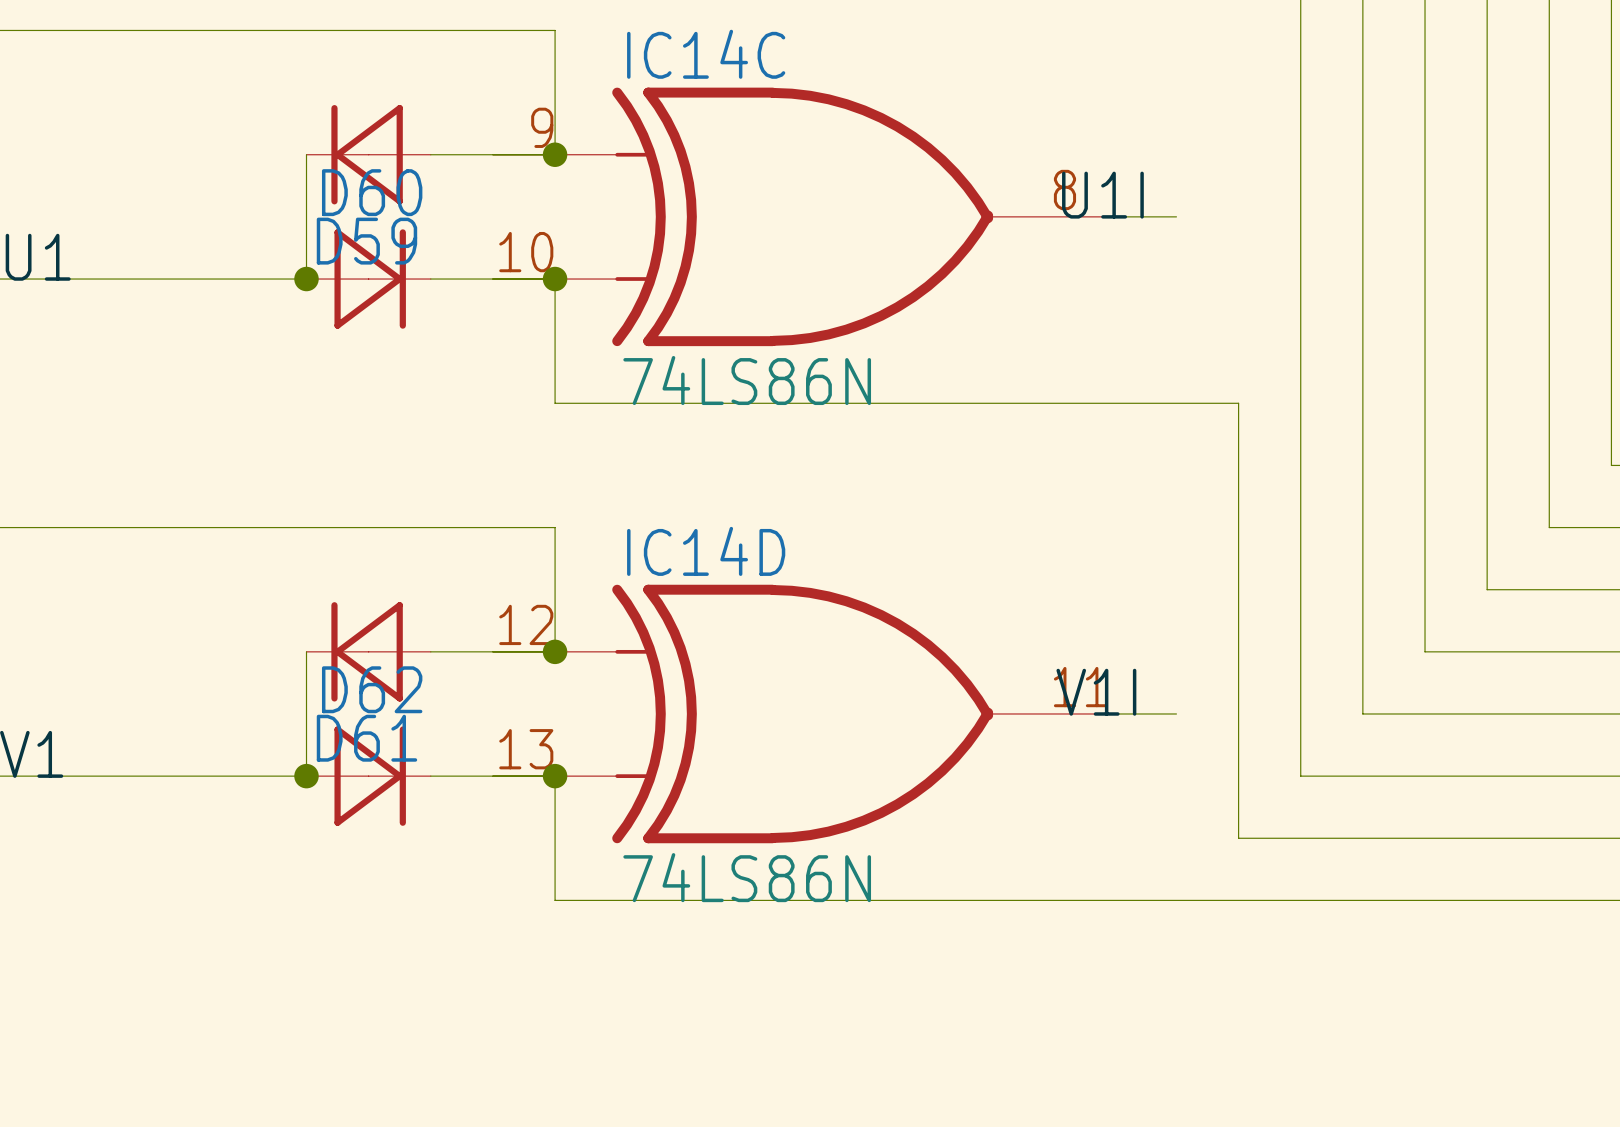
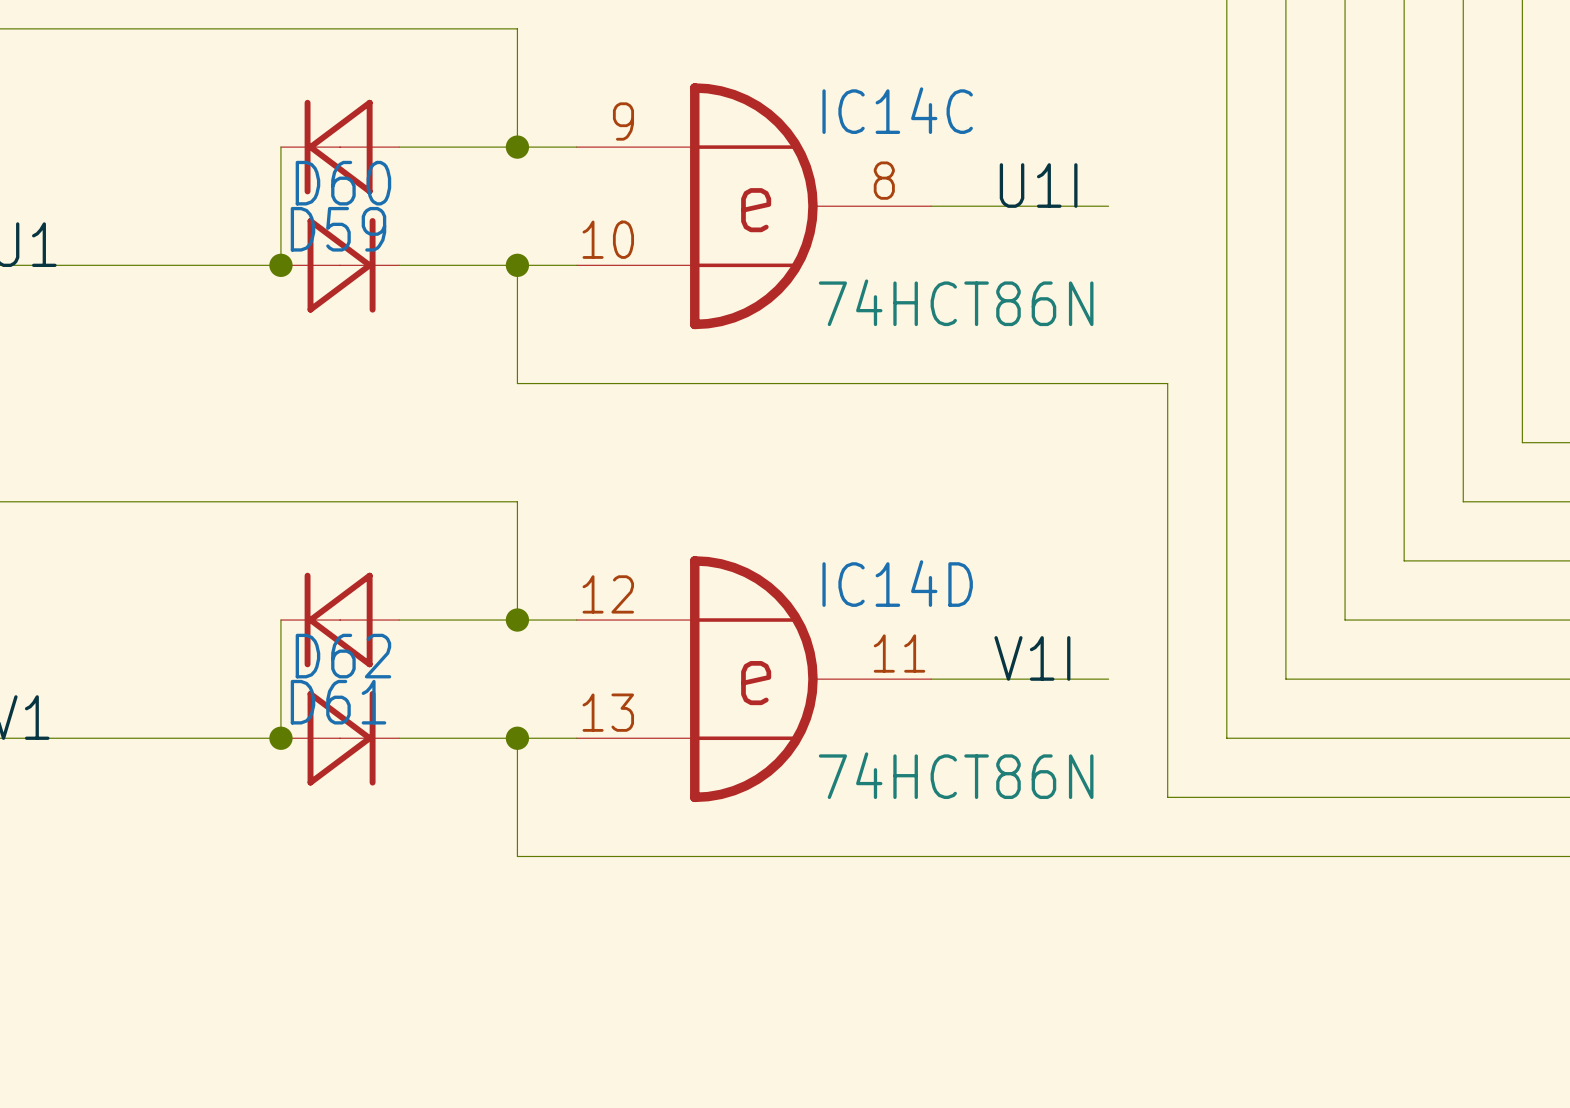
IC14C name position: IC14C (706, 54) -> IC14C (897, 110)
IC14C symbol: [492, 87, 1115, 347] -> [576, 83, 932, 330]
IC14C value: 74LS86N (747, 380) -> 74HCT86N (956, 302)
IC14D name position: IC14D (706, 551) -> IC14D (897, 583)
IC14D symbol: [492, 584, 1115, 844] -> [576, 556, 932, 803]
IC14D value: 74LS86N (747, 877) -> 74HCT86N (956, 775)

